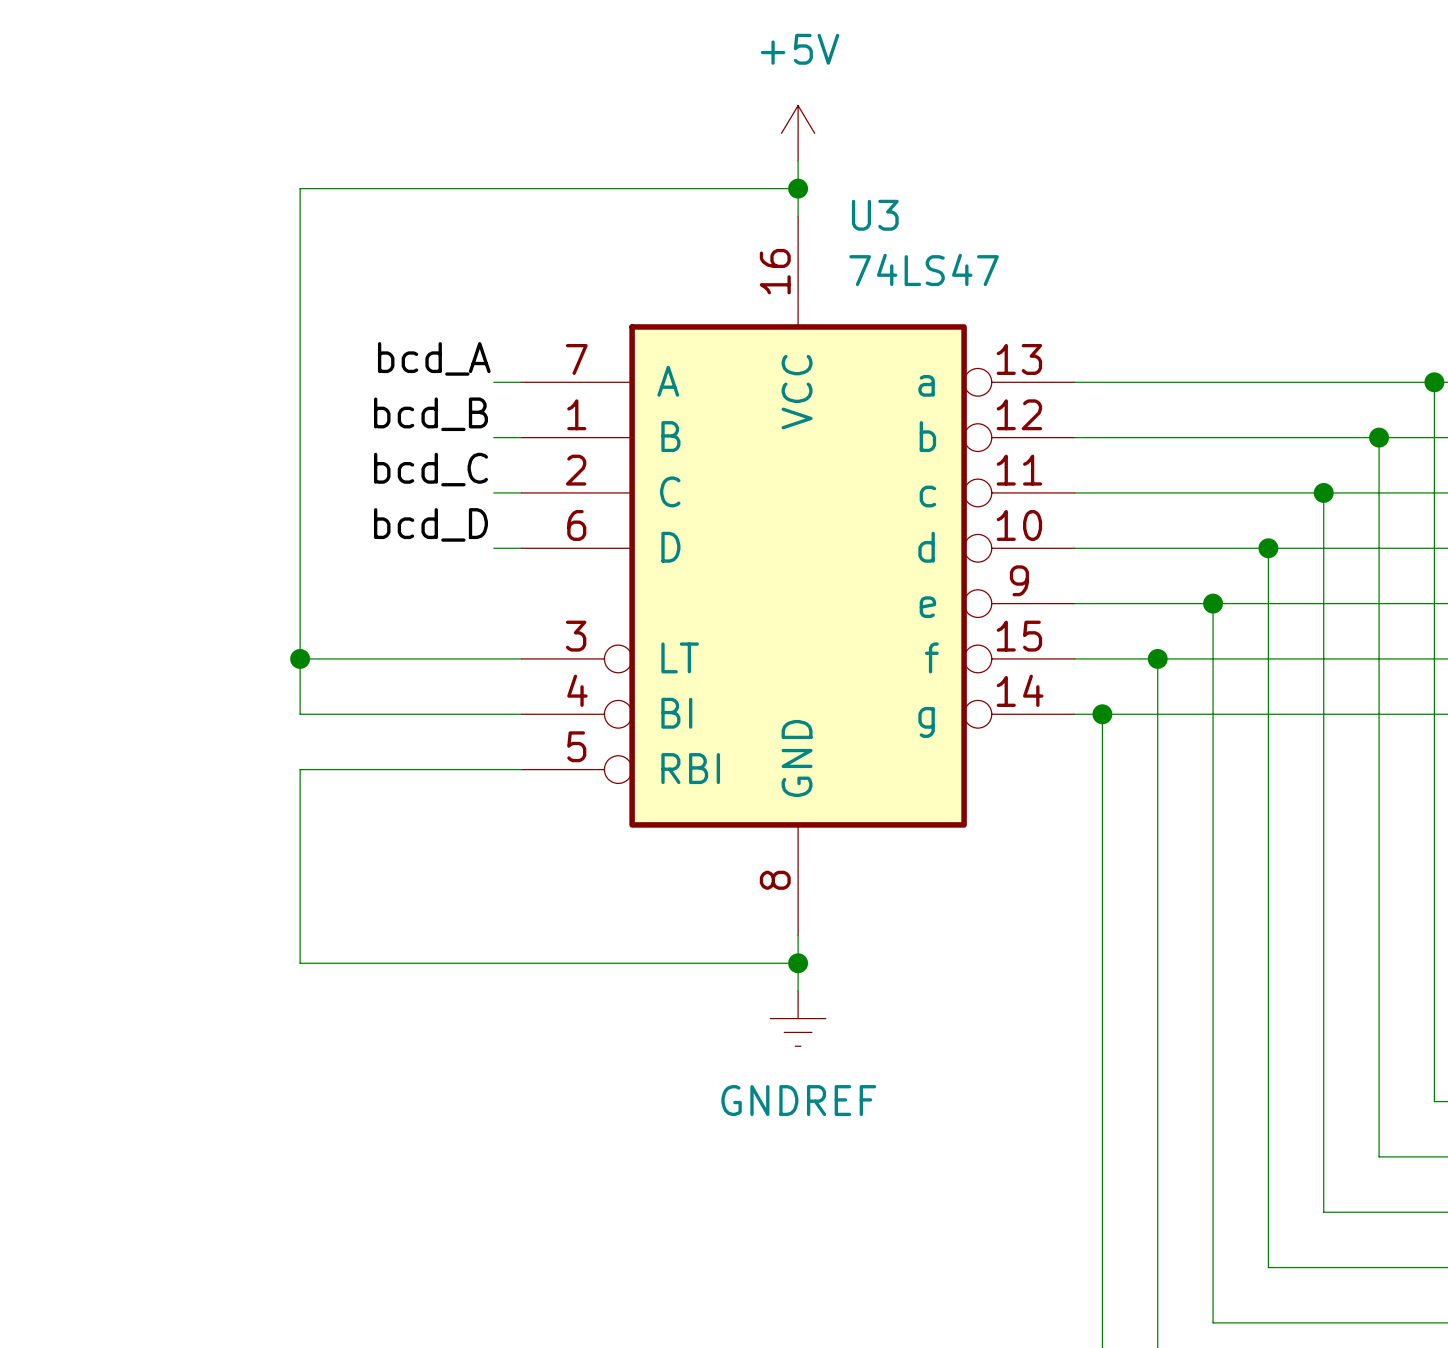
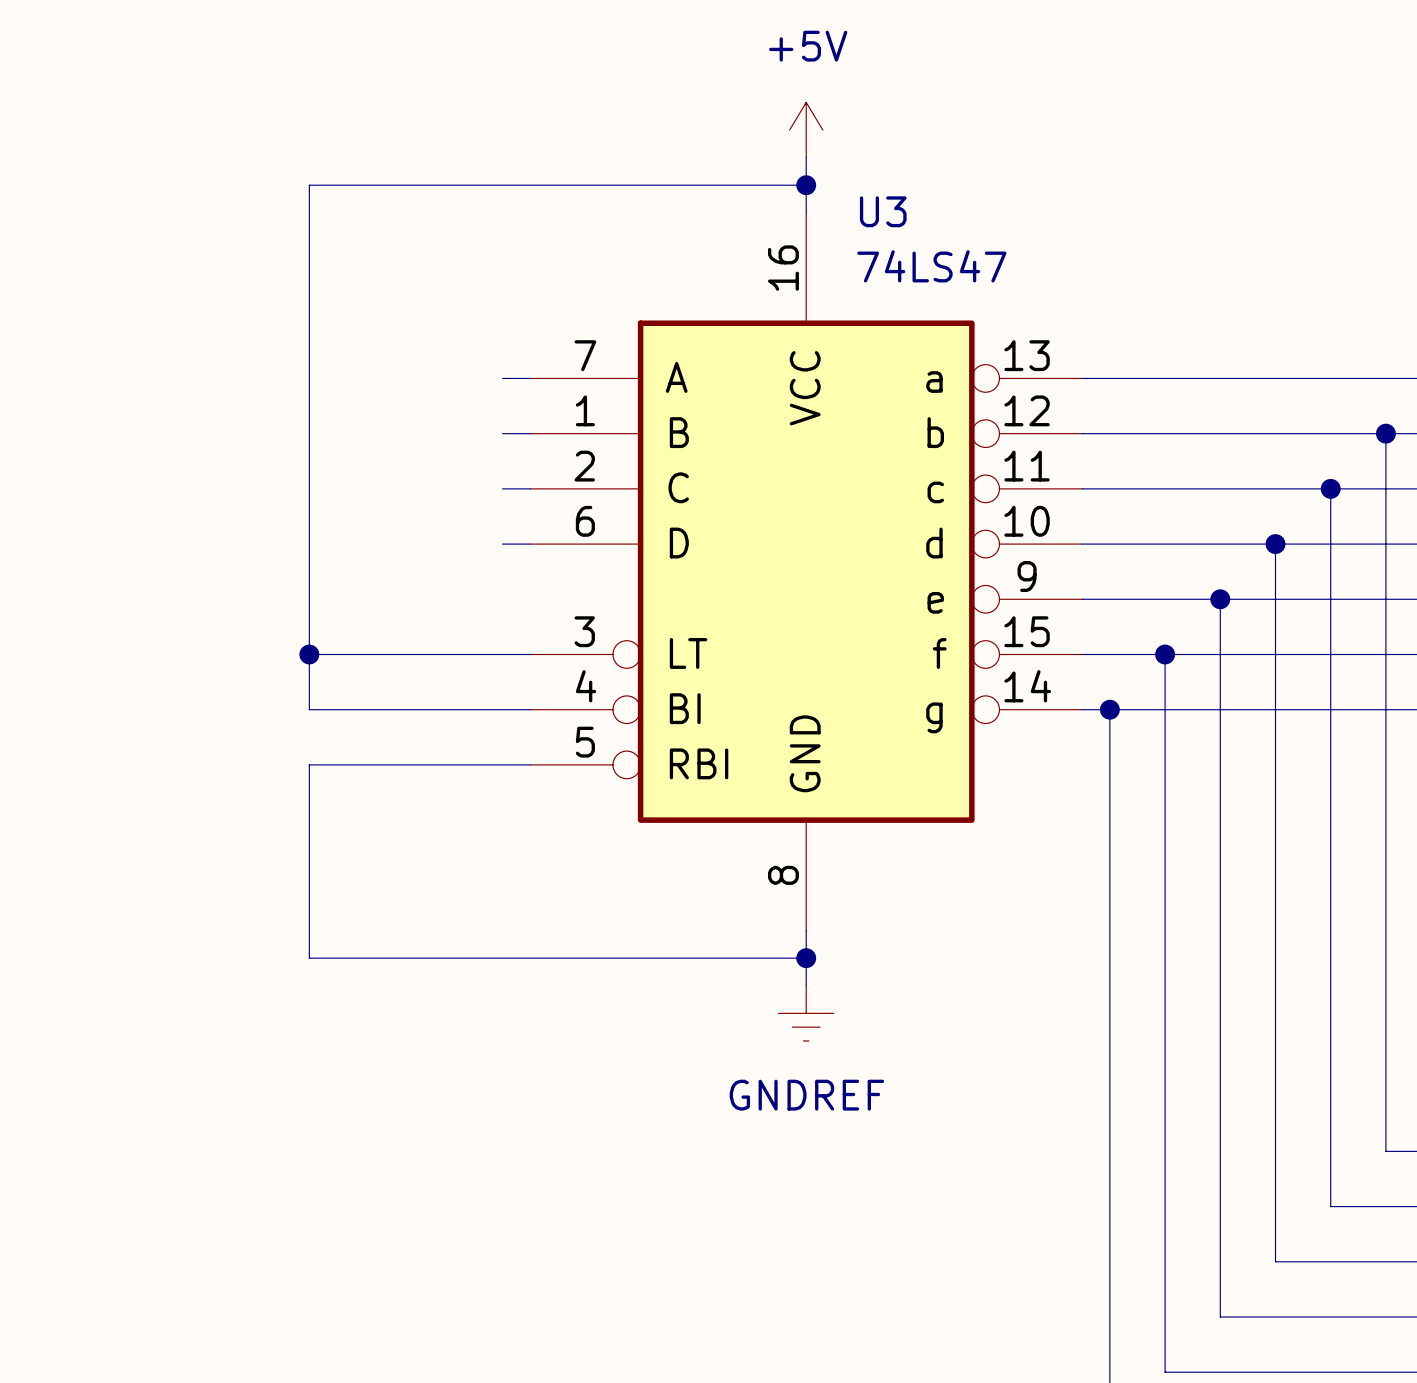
label: bcd_A (434, 358) -> none
label: bcd_B (430, 414) -> none
label: bcd_C (430, 469) -> none
label: bcd_D (430, 524) -> none

